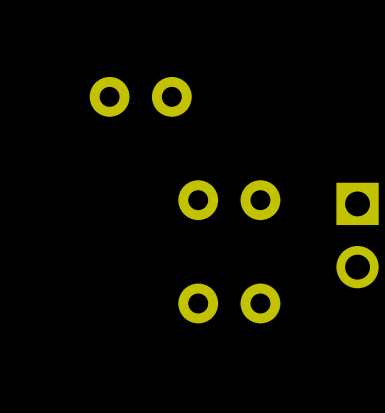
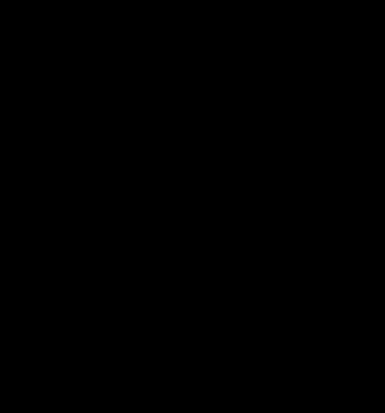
part: (140, 96) -> none
part: (229, 200) -> none
part: (357, 235) -> none
part: (229, 303) -> none

